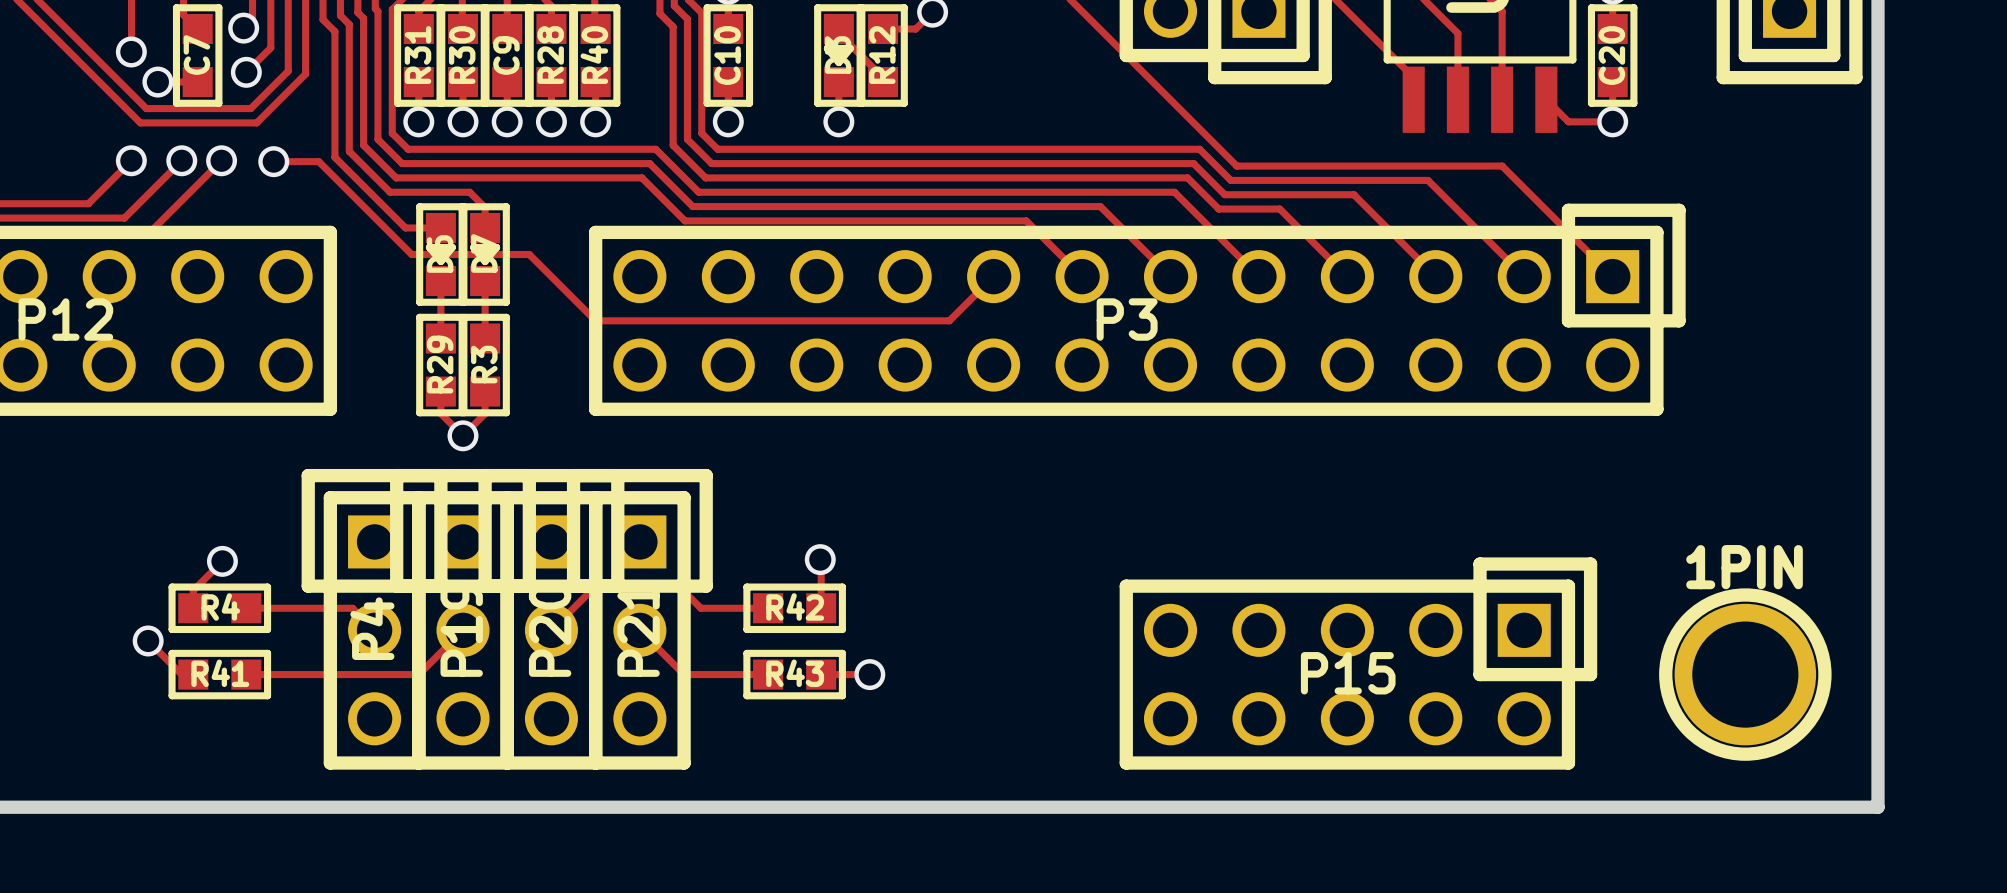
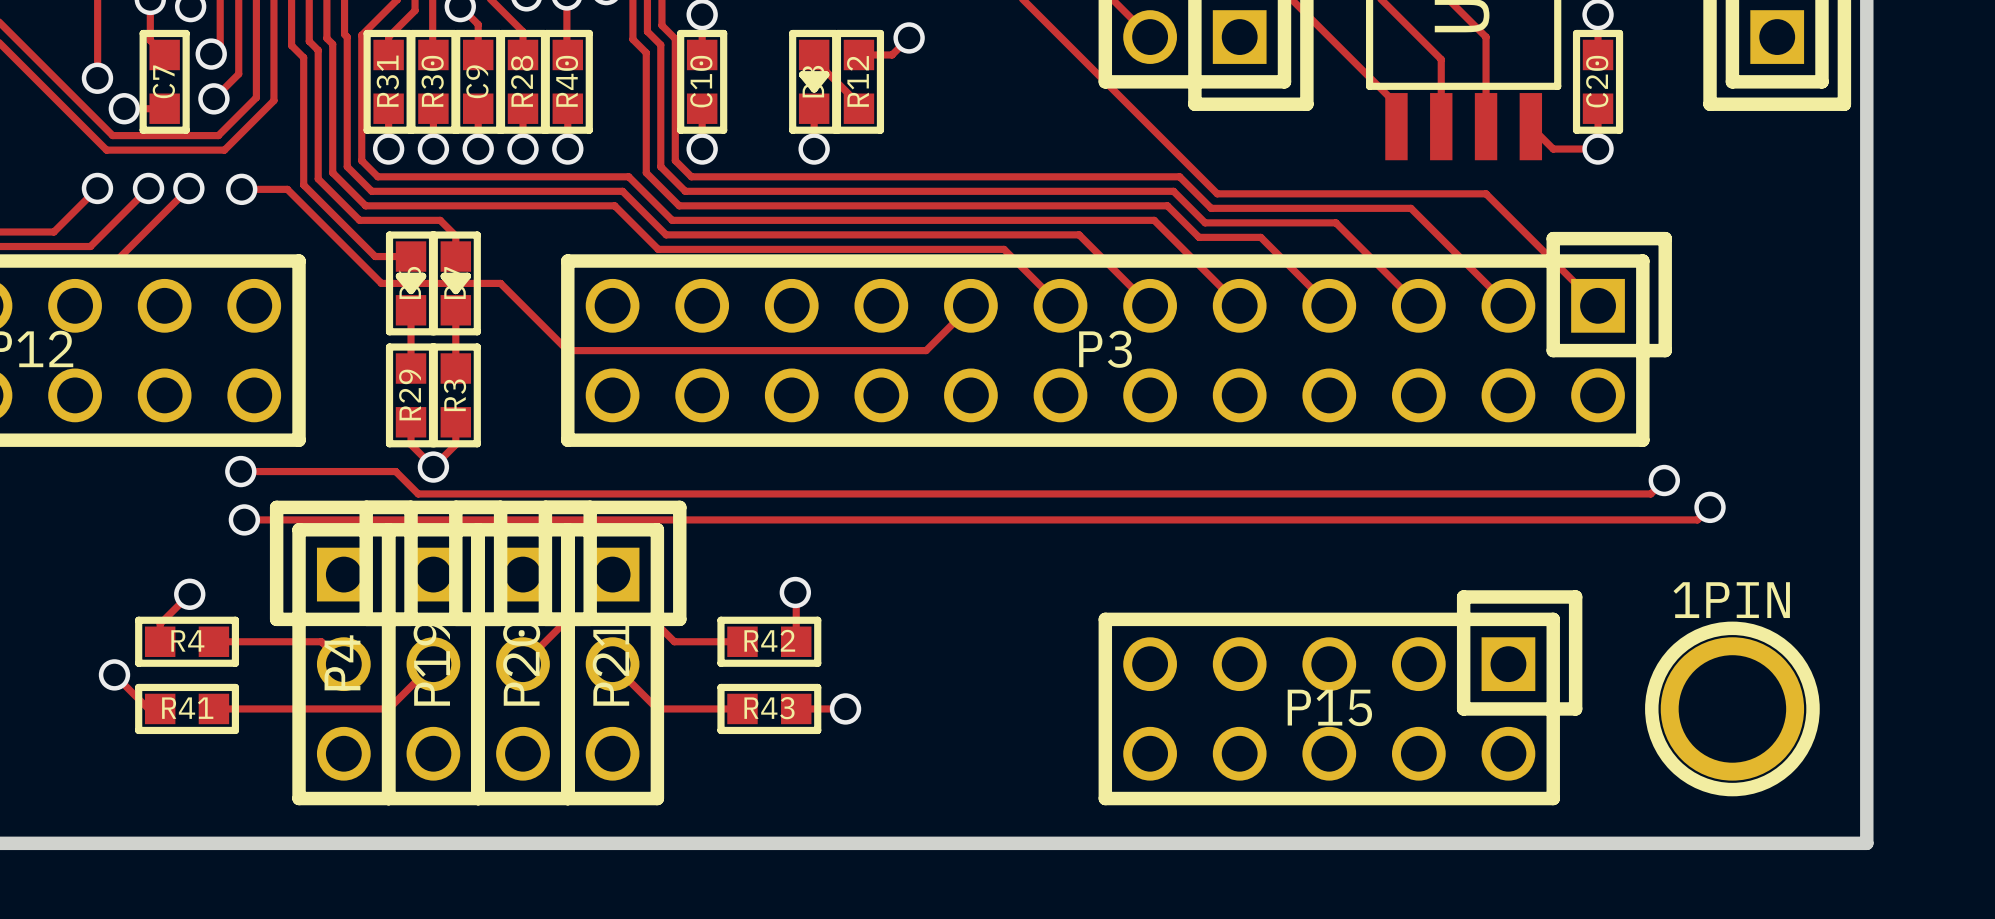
track: none -> (240, 471) (395, 471) (418, 493) (1650, 493) (1664, 480)
via: none -> (240, 471)
via: none -> (1664, 480)
track: none -> (1710, 507) (1697, 519) (244, 519)
via: none -> (1710, 507)
via: none -> (244, 519)

